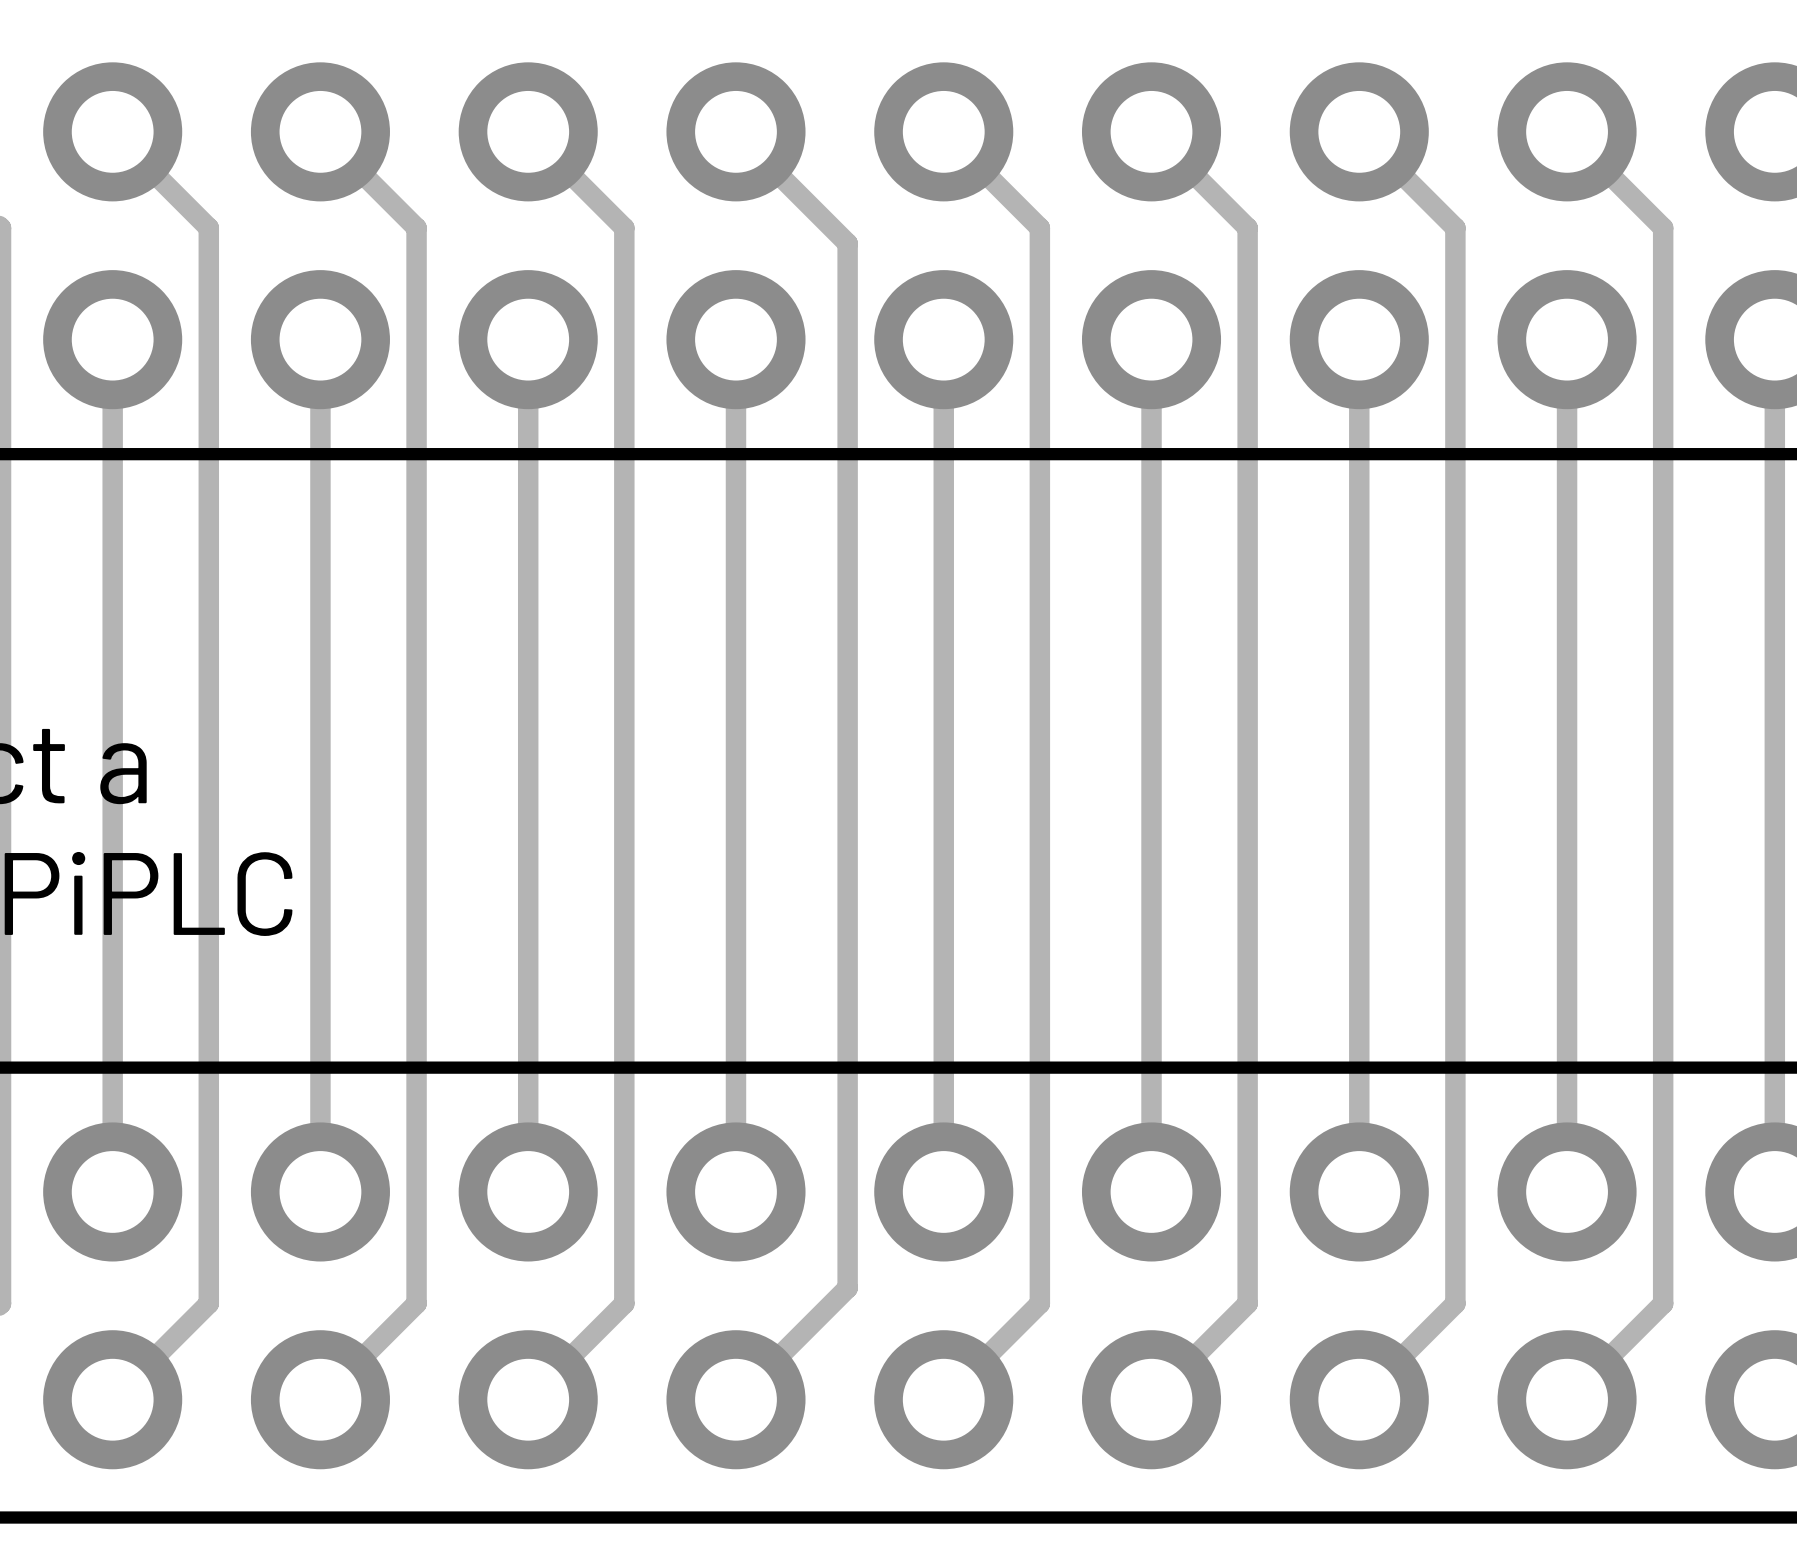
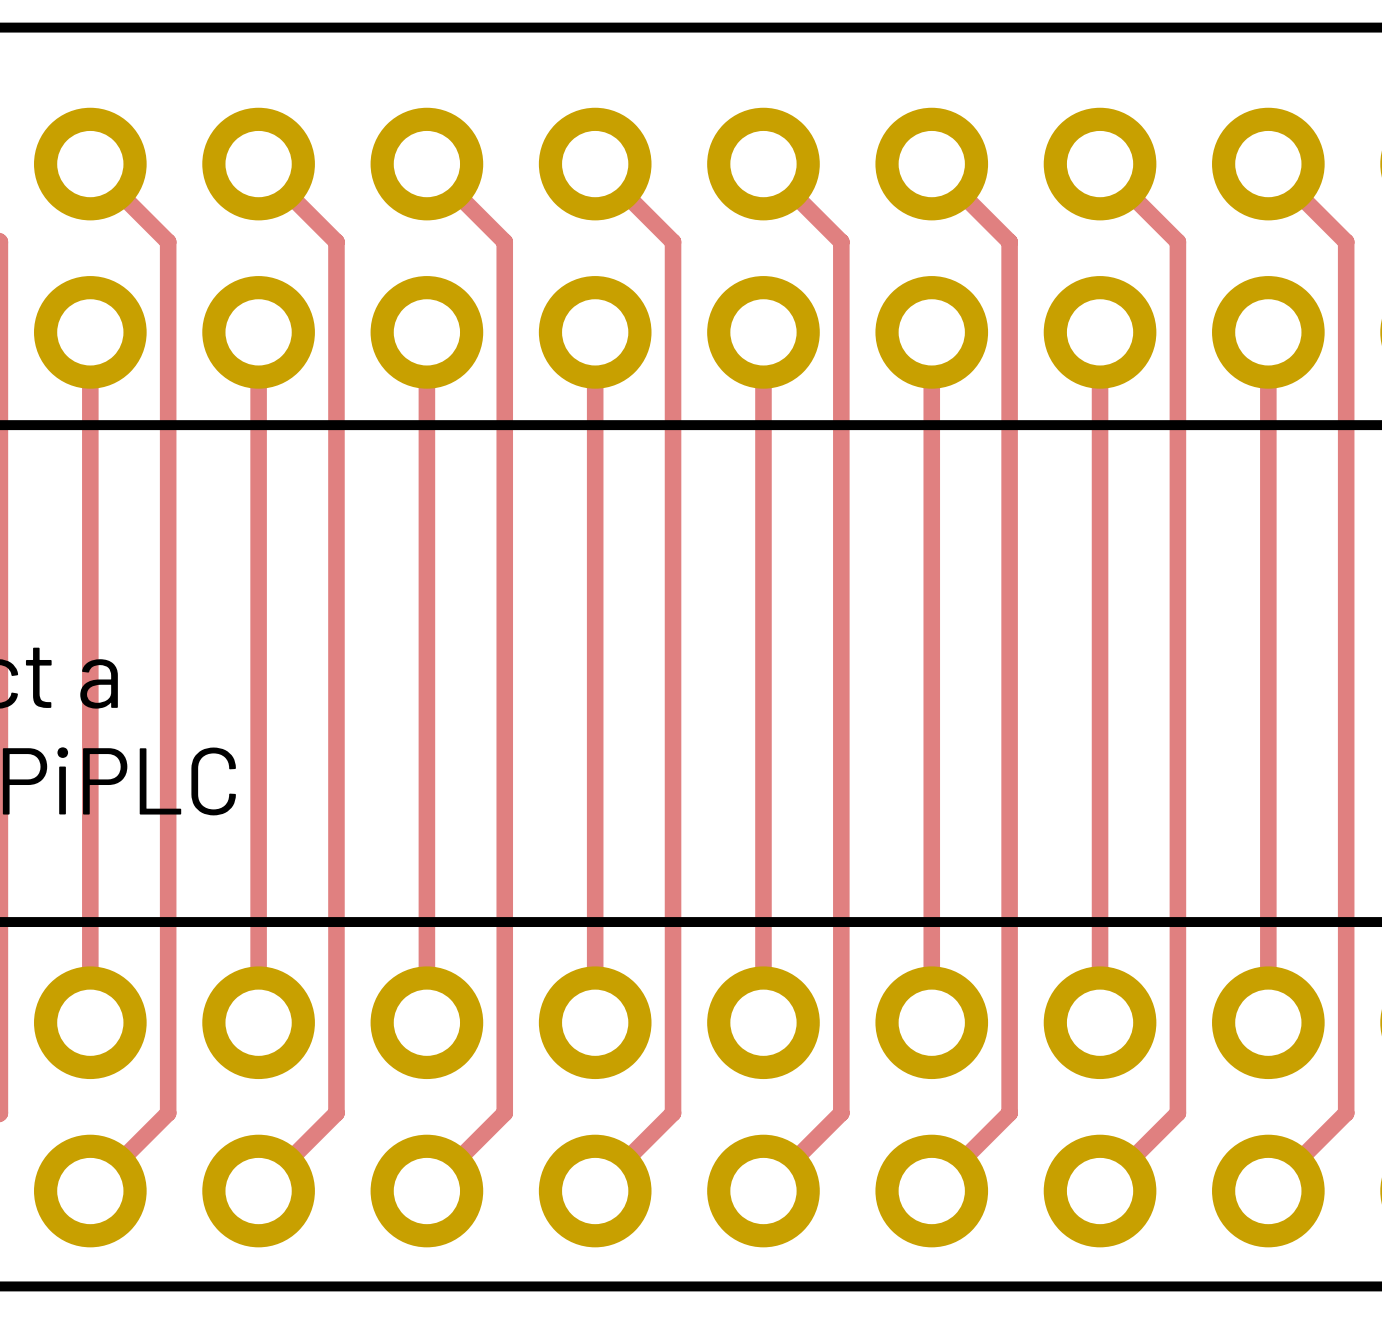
track: (832, 227) (847, 243) (847, 1288) (832, 1303) -> (673, 241) (673, 1113)

